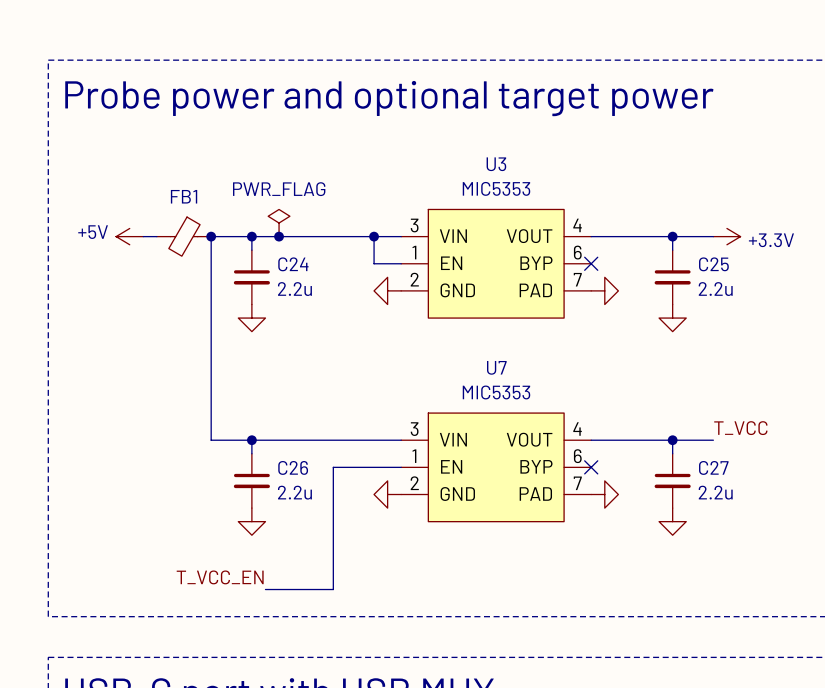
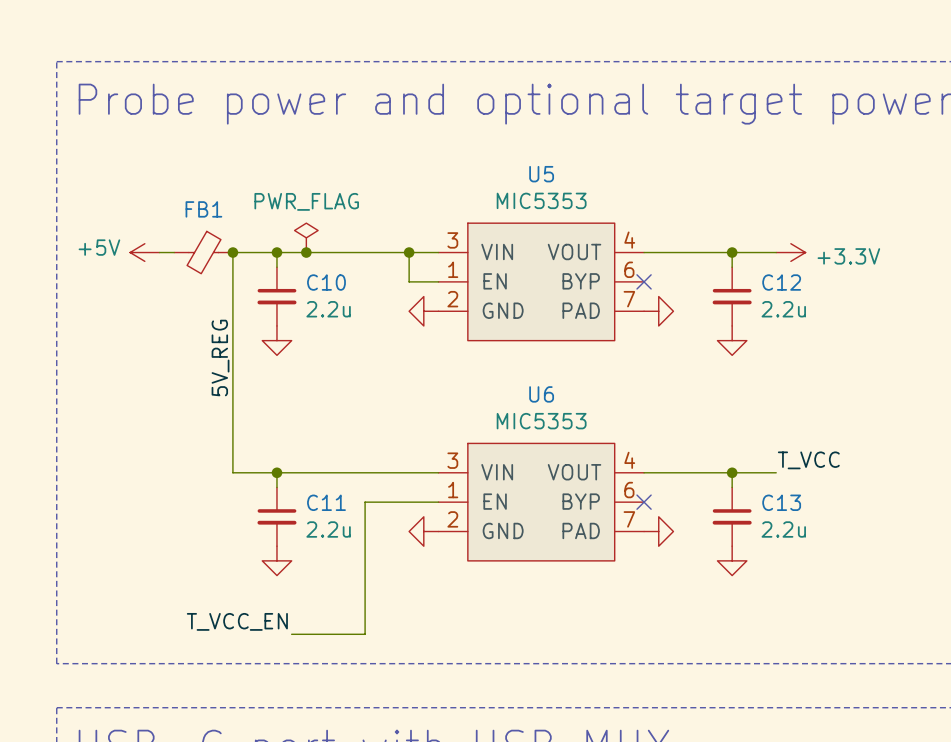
U3 name: U3 (496, 164) -> U5 (541, 174)
C24 name: C24 (293, 264) -> C10 (326, 282)
C25 name: C25 (713, 264) -> C12 (781, 282)
label: none -> 5V_REG (220, 358)
U7 name: U7 (496, 367) -> U6 (541, 394)
C26 name: C26 (293, 467) -> C11 (326, 502)
C27 name: C27 (713, 467) -> C13 (781, 502)

